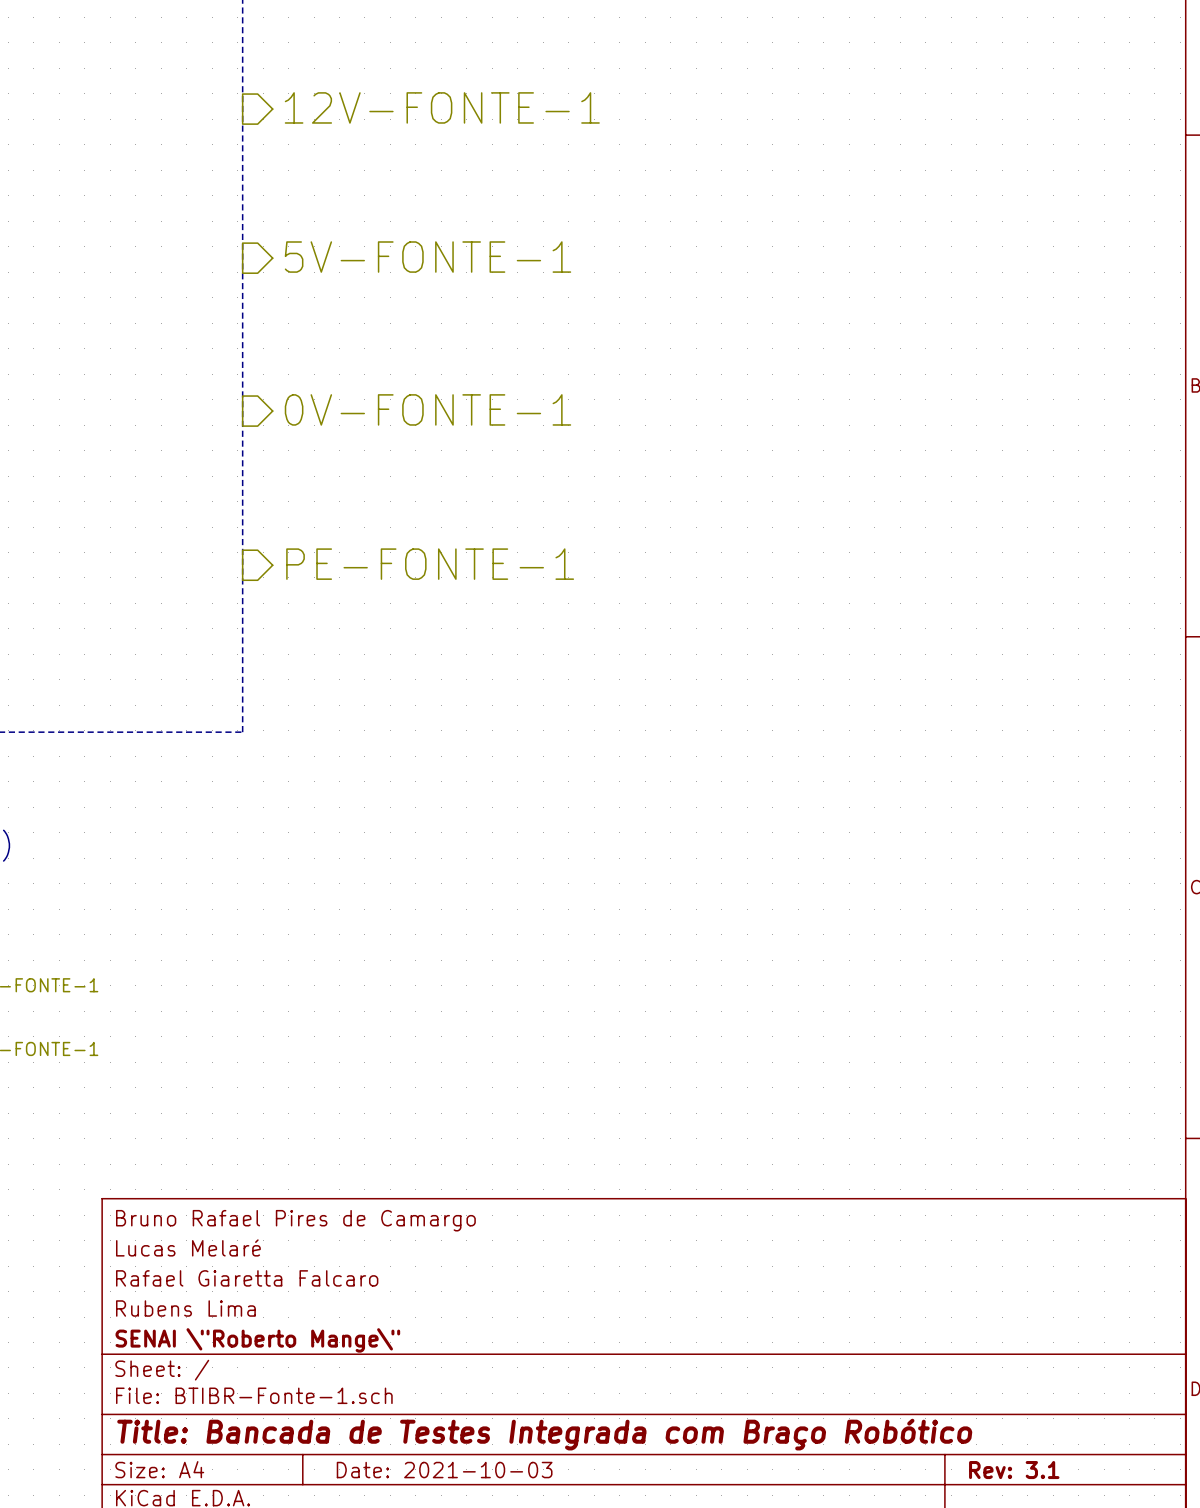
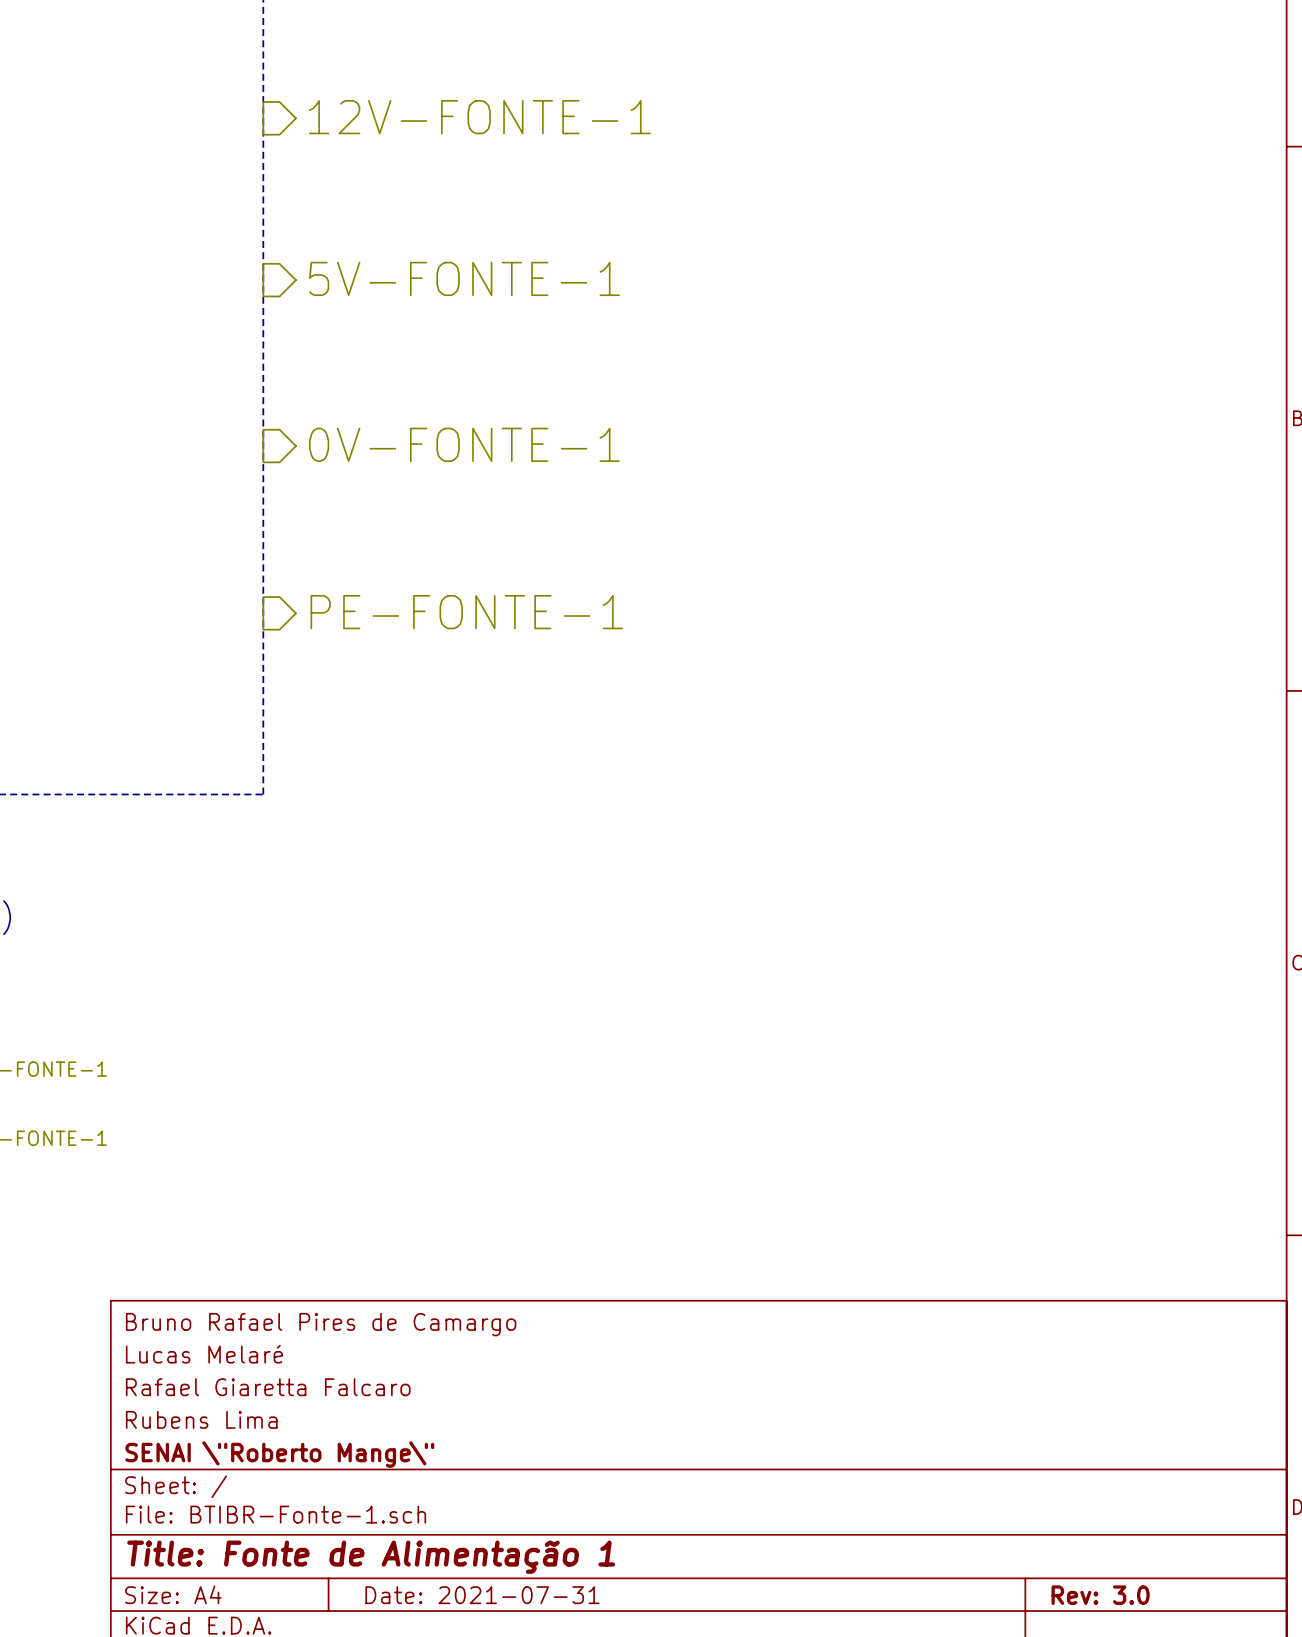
title block: Title: Bancada de Testes Integrada com Braço Robótico (544, 1434) -> Title: Fonte de Alimentação 1 (371, 1557)
title block: Date: 2021-10-03 (444, 1470) -> Date: 2021-07-31 (482, 1595)
title block: Rev: 3.1 (1014, 1470) -> Rev: 3.0 (1100, 1595)

